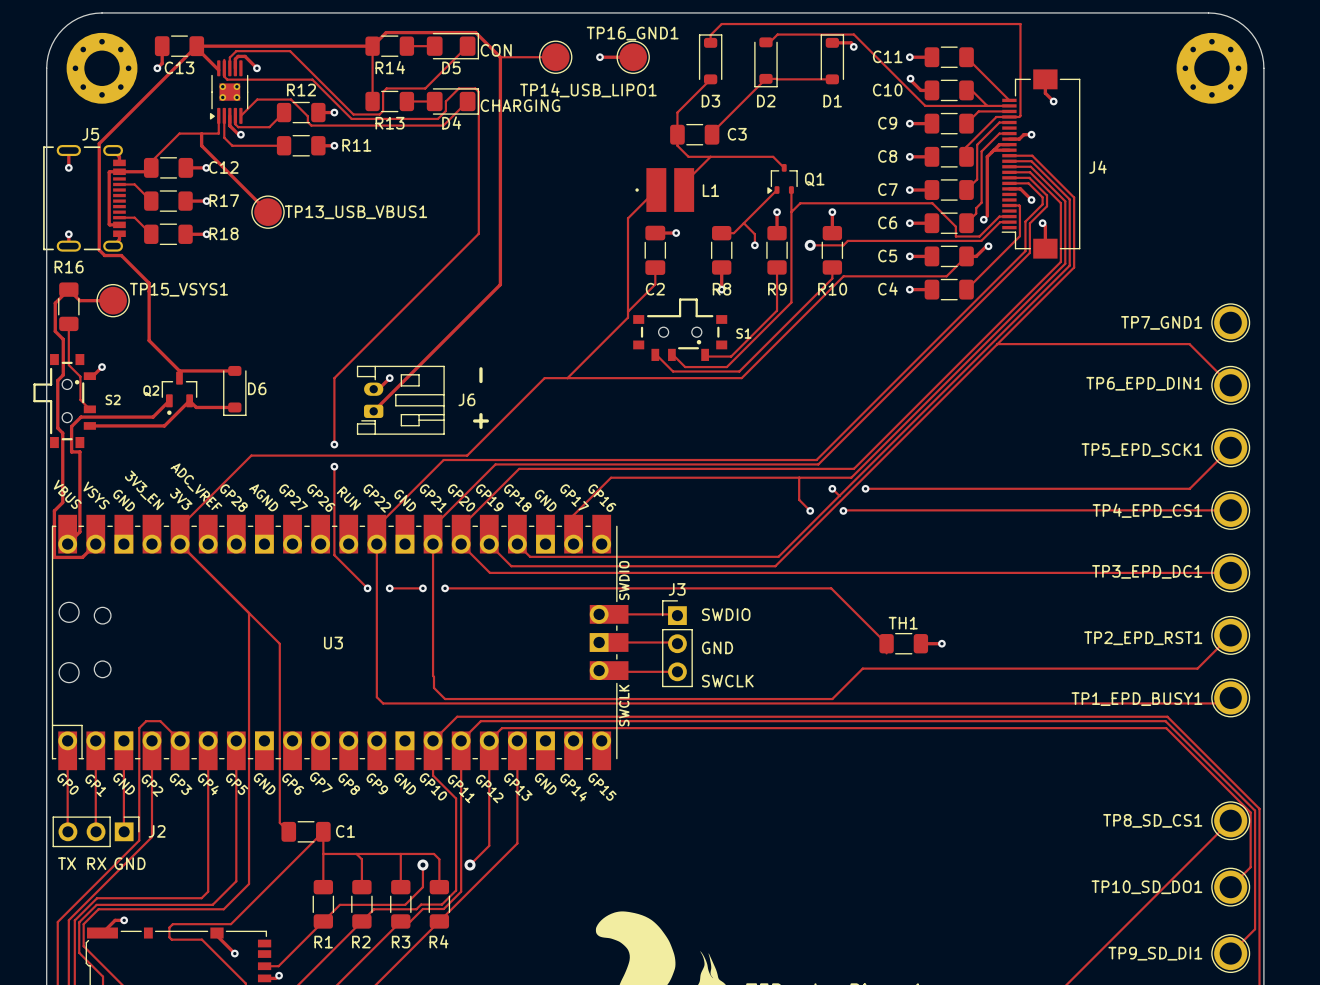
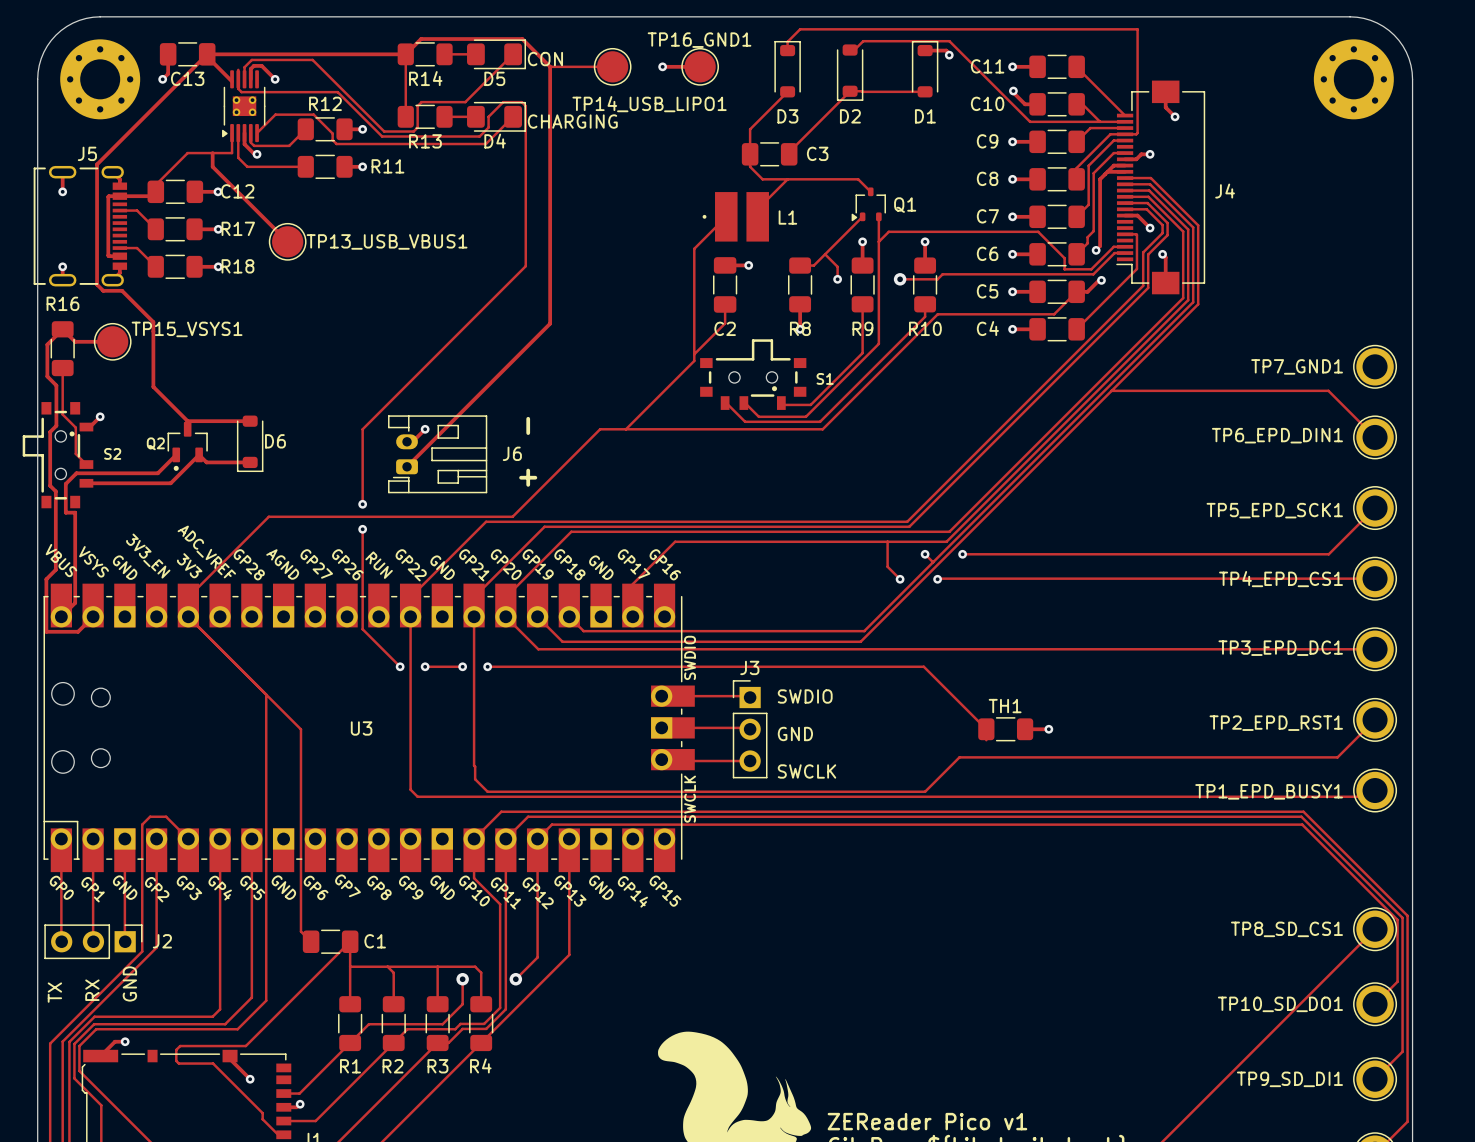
text rotation: 0° (67, 863) -> 90° counterclockwise (54, 992)
text rotation: 0° (96, 863) -> 90° counterclockwise (92, 990)
text rotation: 0° (130, 863) -> 90° counterclockwise (129, 983)

